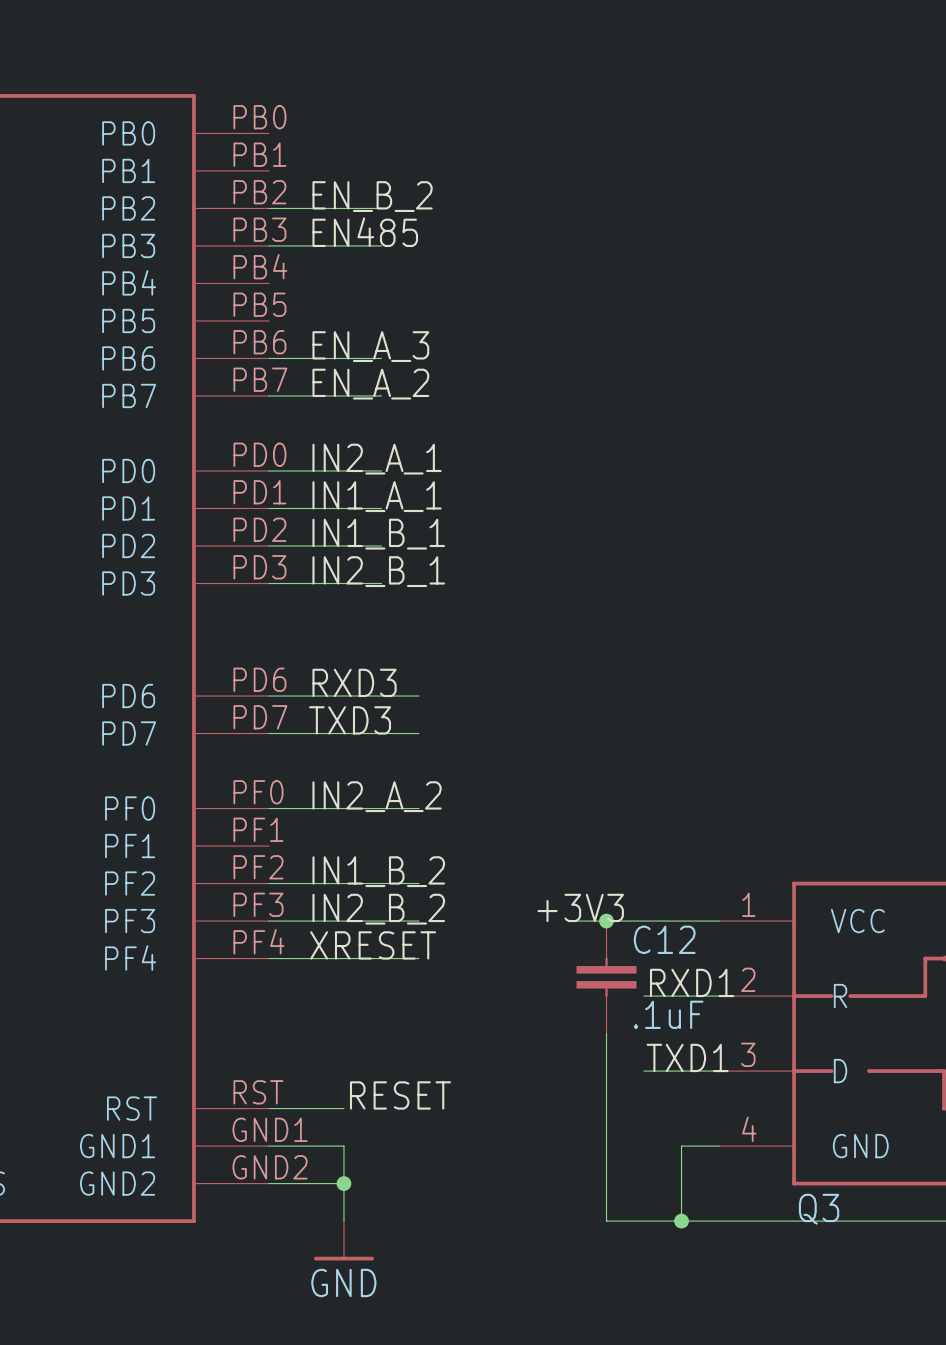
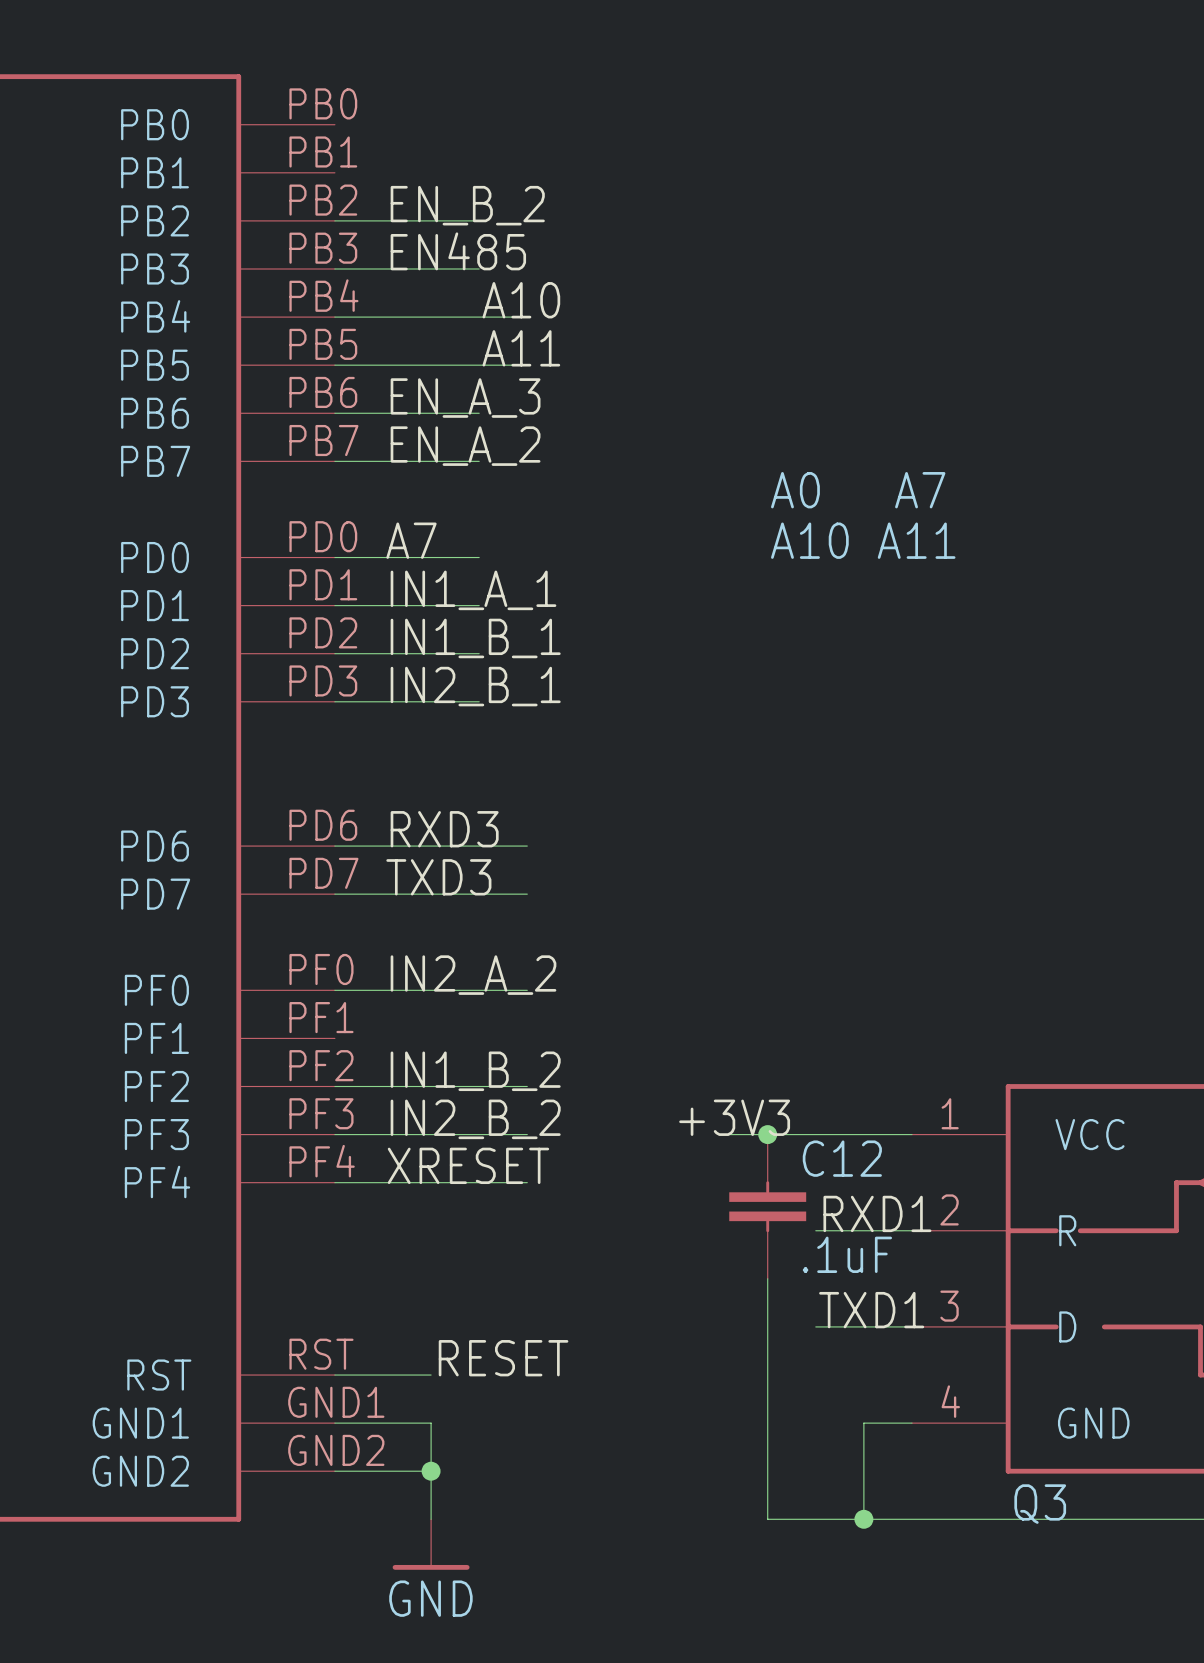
label: none -> A10 (521, 300)
wire: none -> (334, 317) (527, 317)
label: none -> A11 (521, 348)
wire: none -> (334, 365) (527, 365)
text: none -> A0 A7 (858, 490)
text: none -> A10 A11 (863, 540)
label: IN2_A_1 (377, 459) -> A7 (411, 540)

